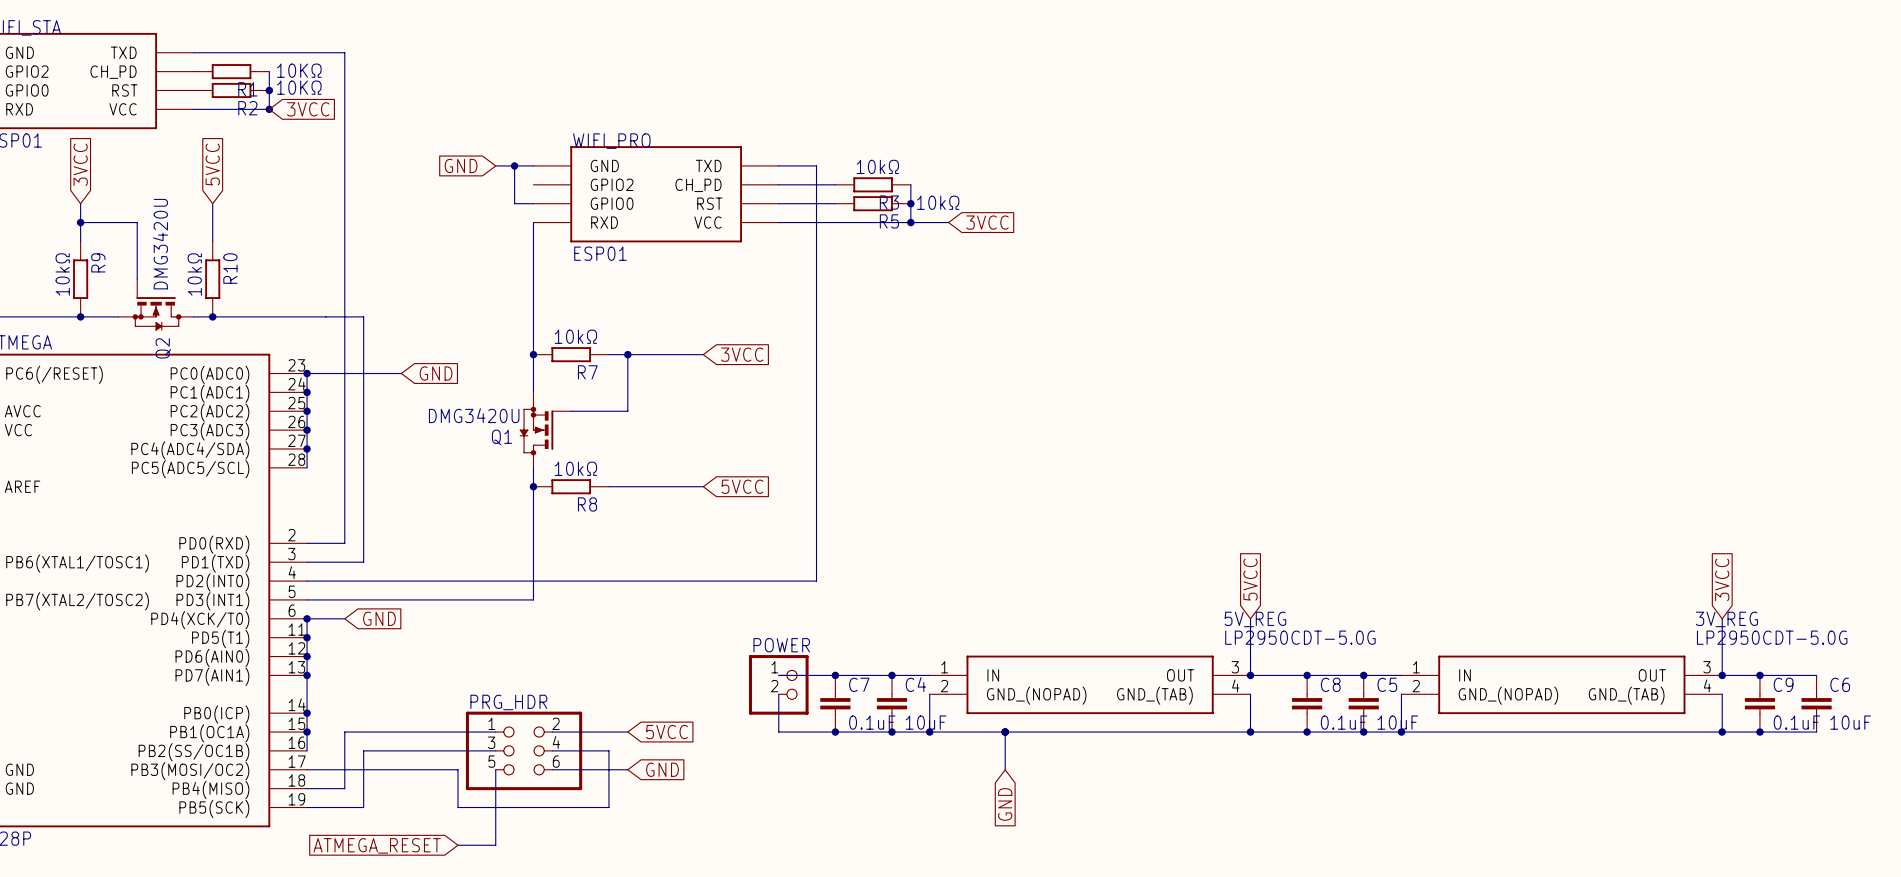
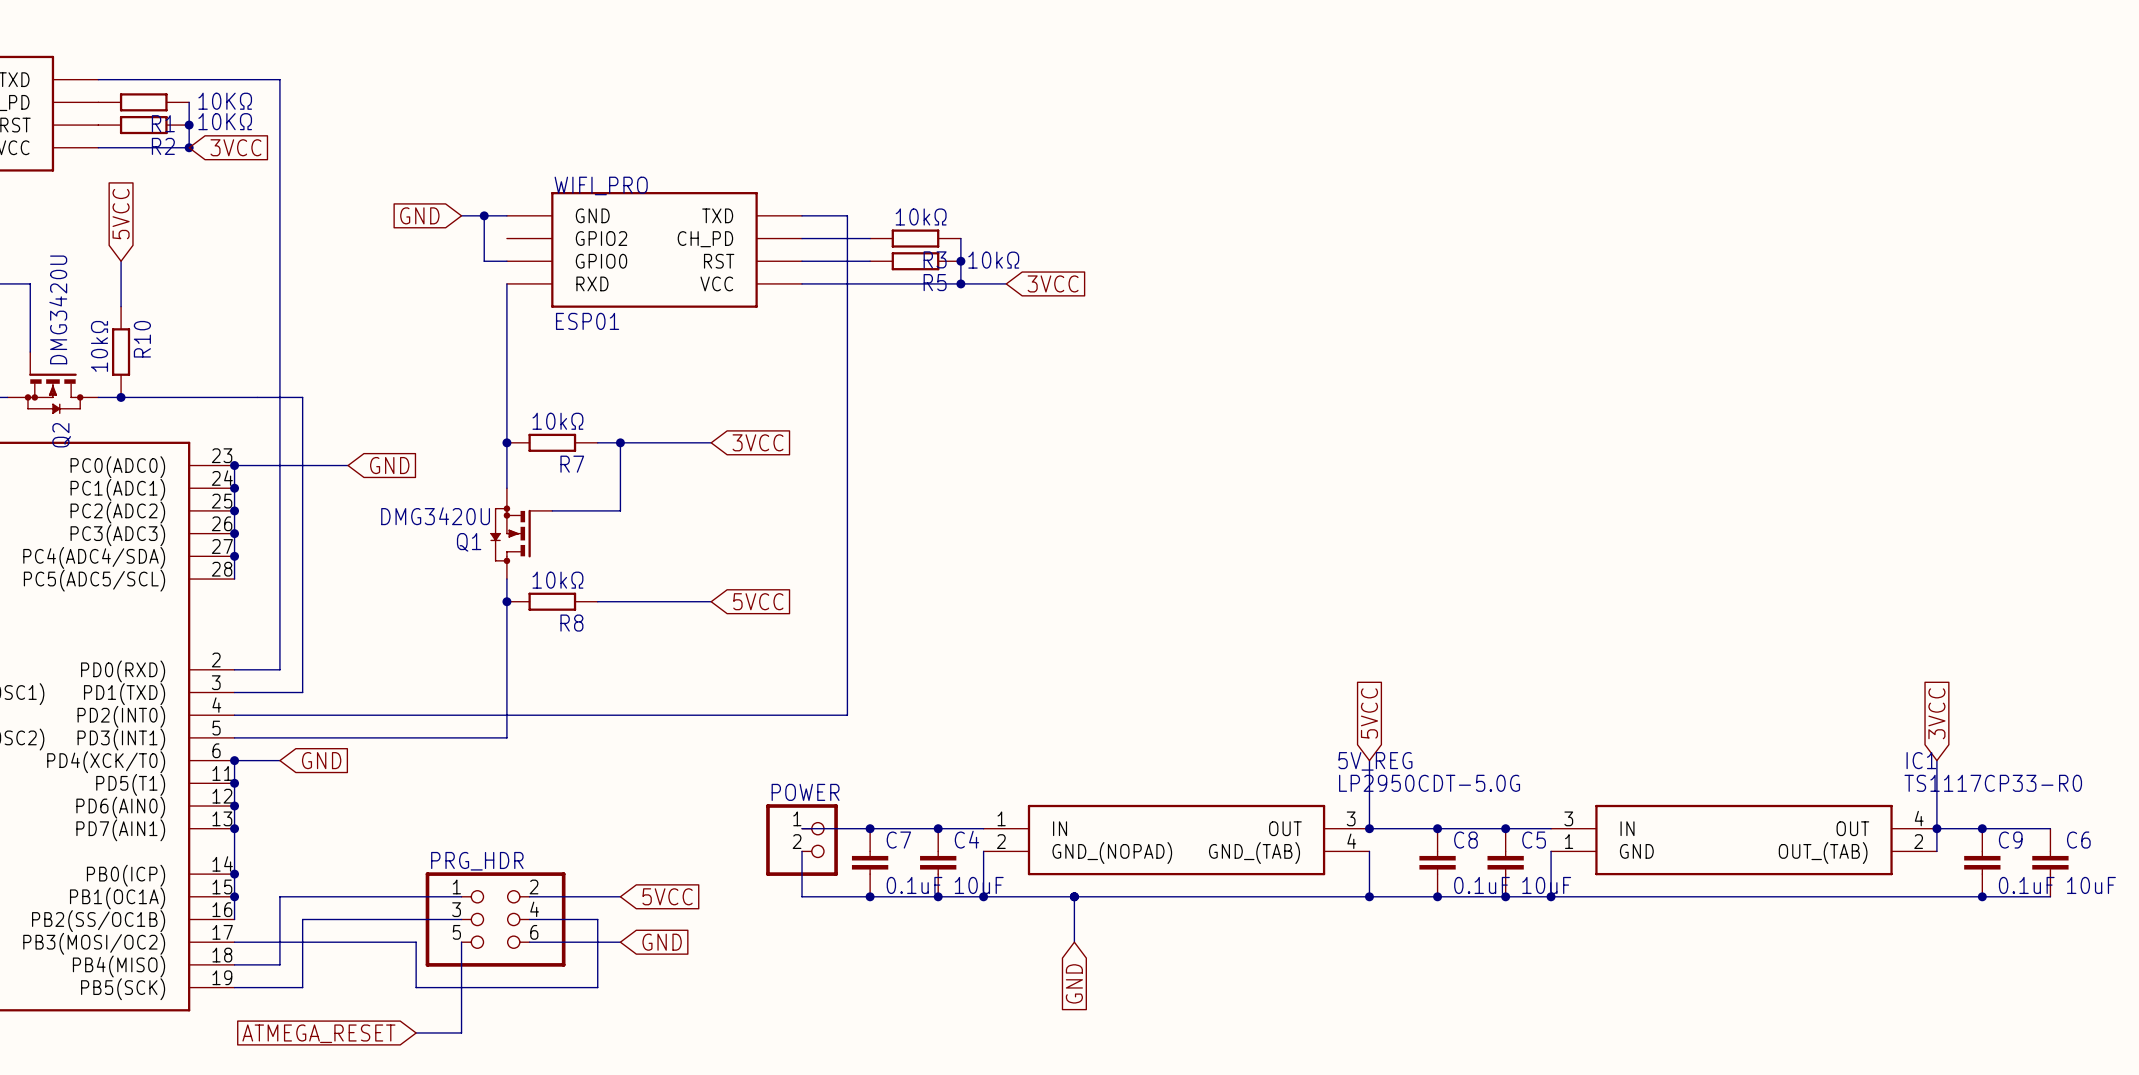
3V_REG name: 3V_REG (1726, 619) -> IC1 (1921, 760)
3V_REG value: LP2950CDT-5.0G (1772, 637) -> TS1117CP33-R0 (1993, 783)
3V_REG pin number: 1 (1416, 667) -> 3 (1568, 818)
3V_REG pin number: 3 (1707, 667) -> 4 (1919, 818)
3V_REG pin number: 4 (1707, 685) -> 2 (1918, 841)
3V_REG pin number: 2 (1416, 686) -> 1 (1569, 841)
wire: (1722, 694) (1722, 732) -> (1936, 851) (1936, 828)
3V_REG pin name: GND_(NOPAD) (1508, 695) -> GND (1636, 851)
3V_REG pin name: GND_(TAB) (1626, 695) -> OUT_(TAB) (1823, 853)
junction: (1722, 732) -> none

